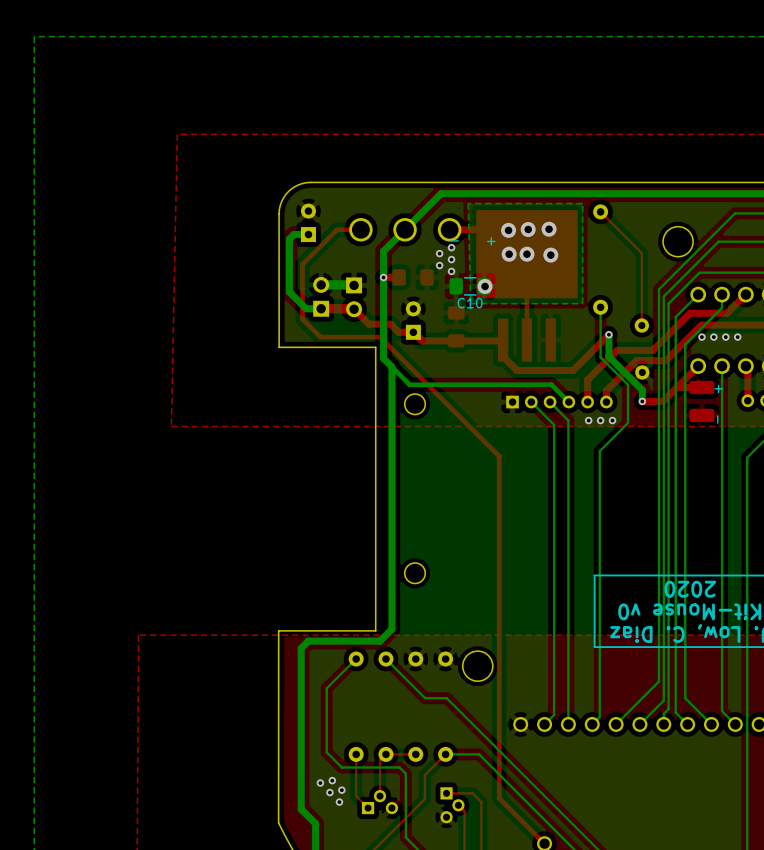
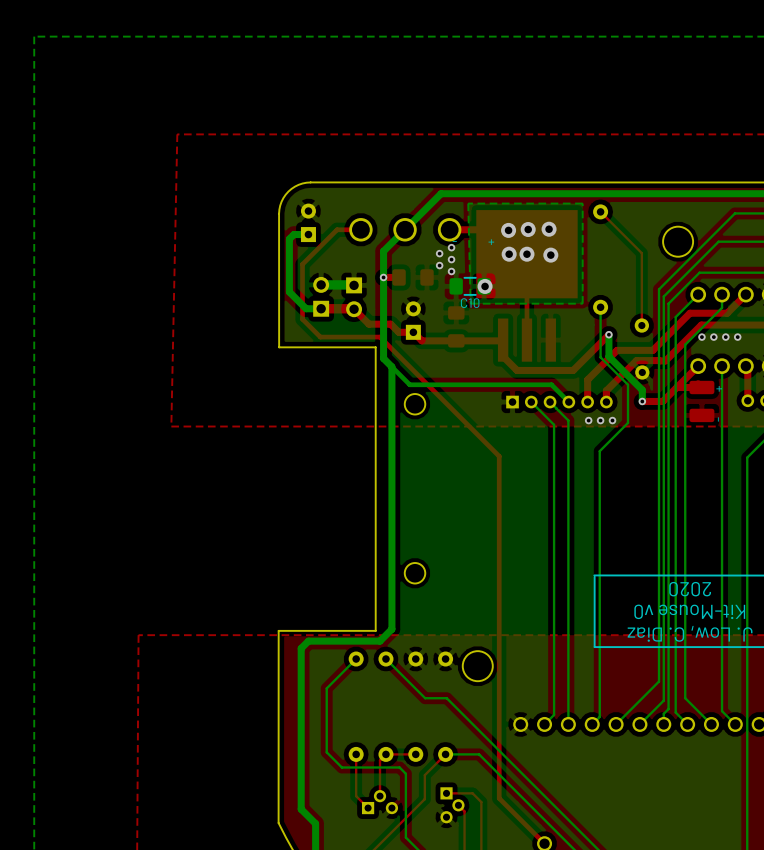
via: (332, 780) -> none
via: (320, 783) -> none
via: (341, 790) -> none
via: (329, 792) -> none
via: (339, 802) -> none

